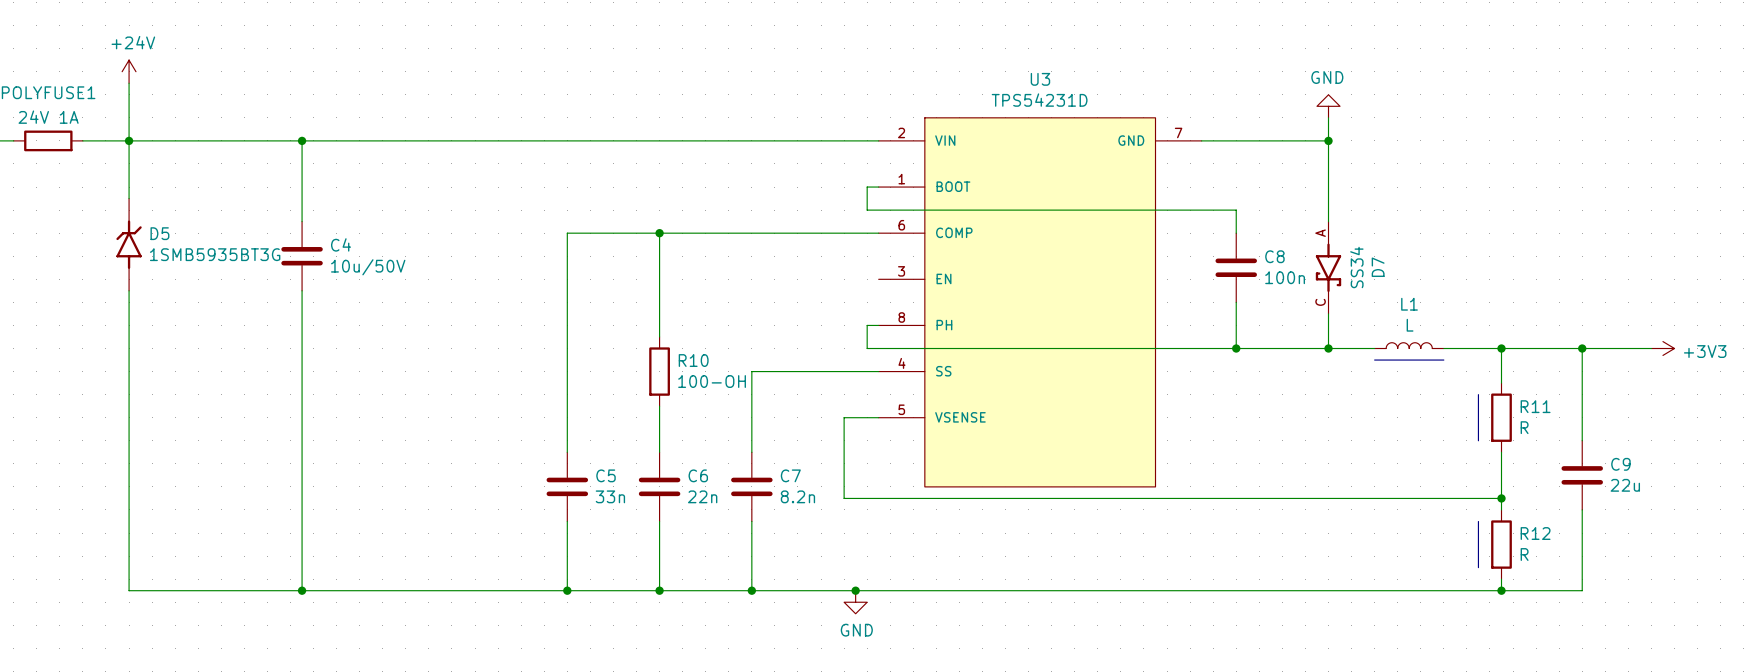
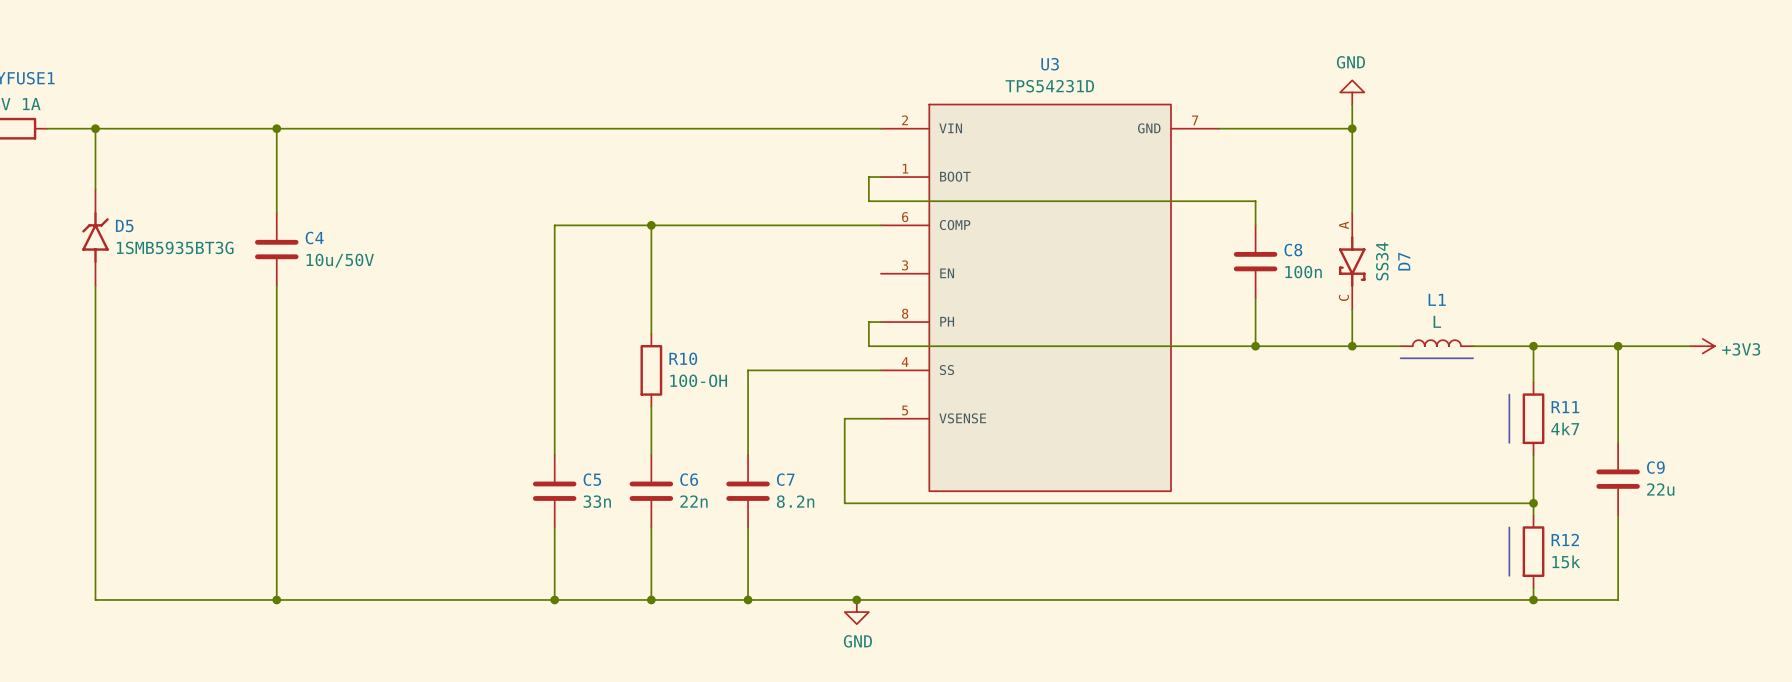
power symbol: +24V (129, 71) -> none
wire: (129, 83) (129, 140) -> none
R11 value: R (1524, 427) -> 4k7 (1565, 428)
R12 value: R (1524, 554) -> 15k (1566, 561)

